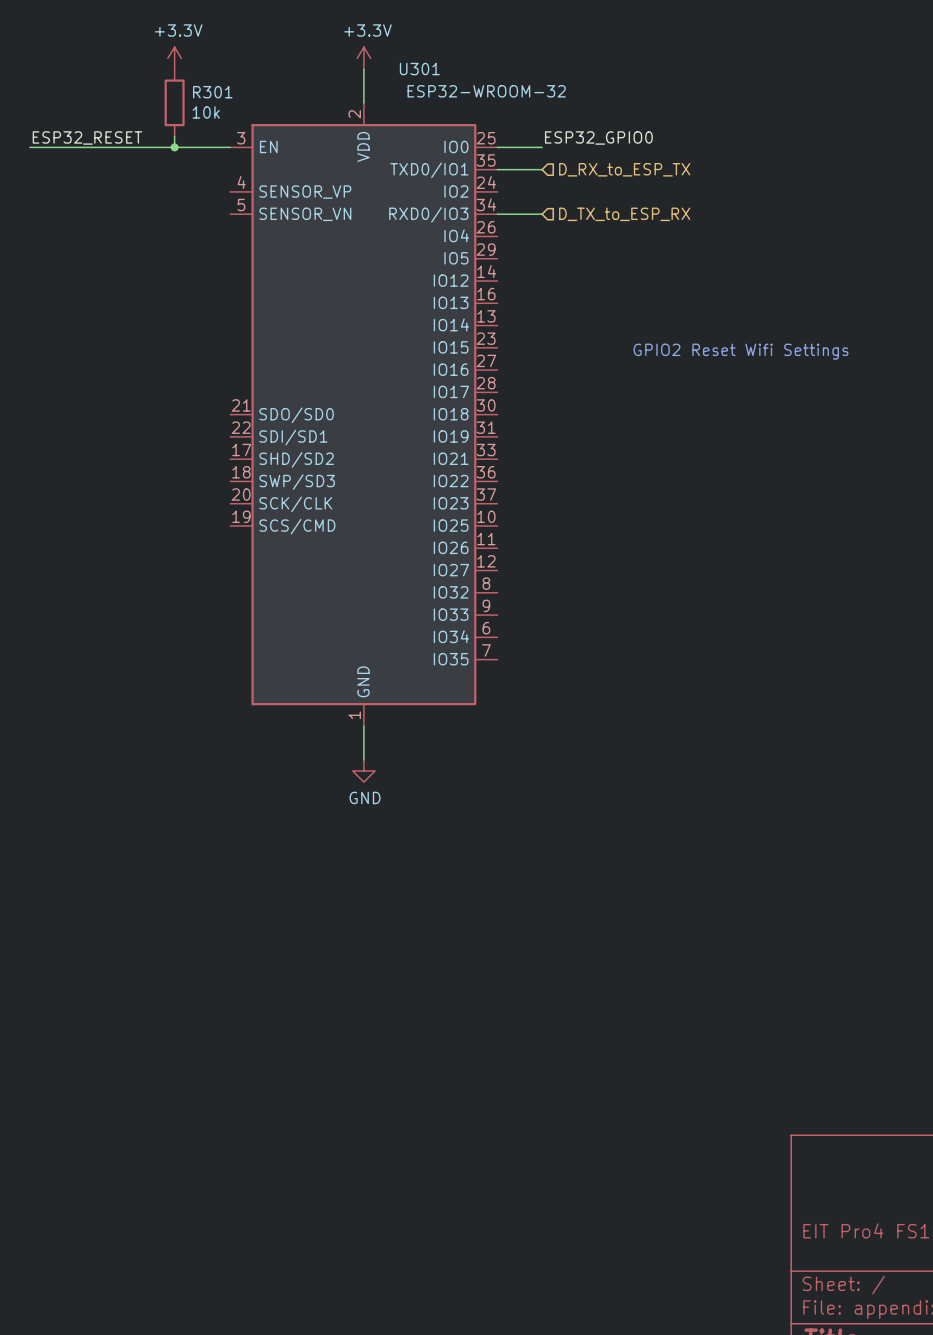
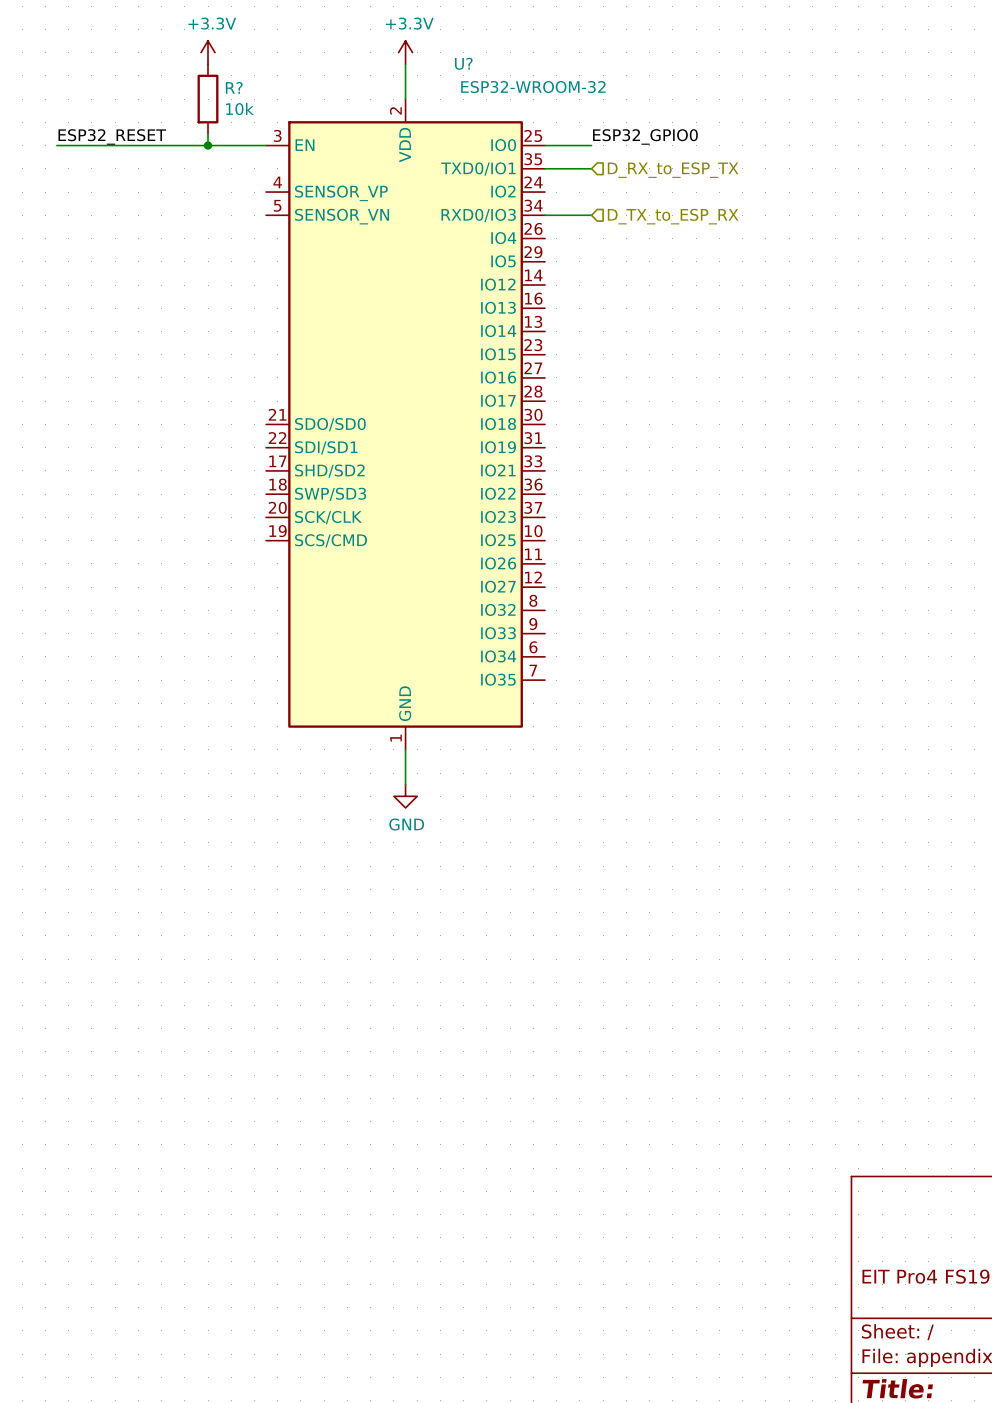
U301 name: U301 (419, 69) -> U? (463, 63)
R301 name: R301 (212, 92) -> R? (234, 87)
text: GPIO2 Reset Wifi Settings (741, 351) -> none

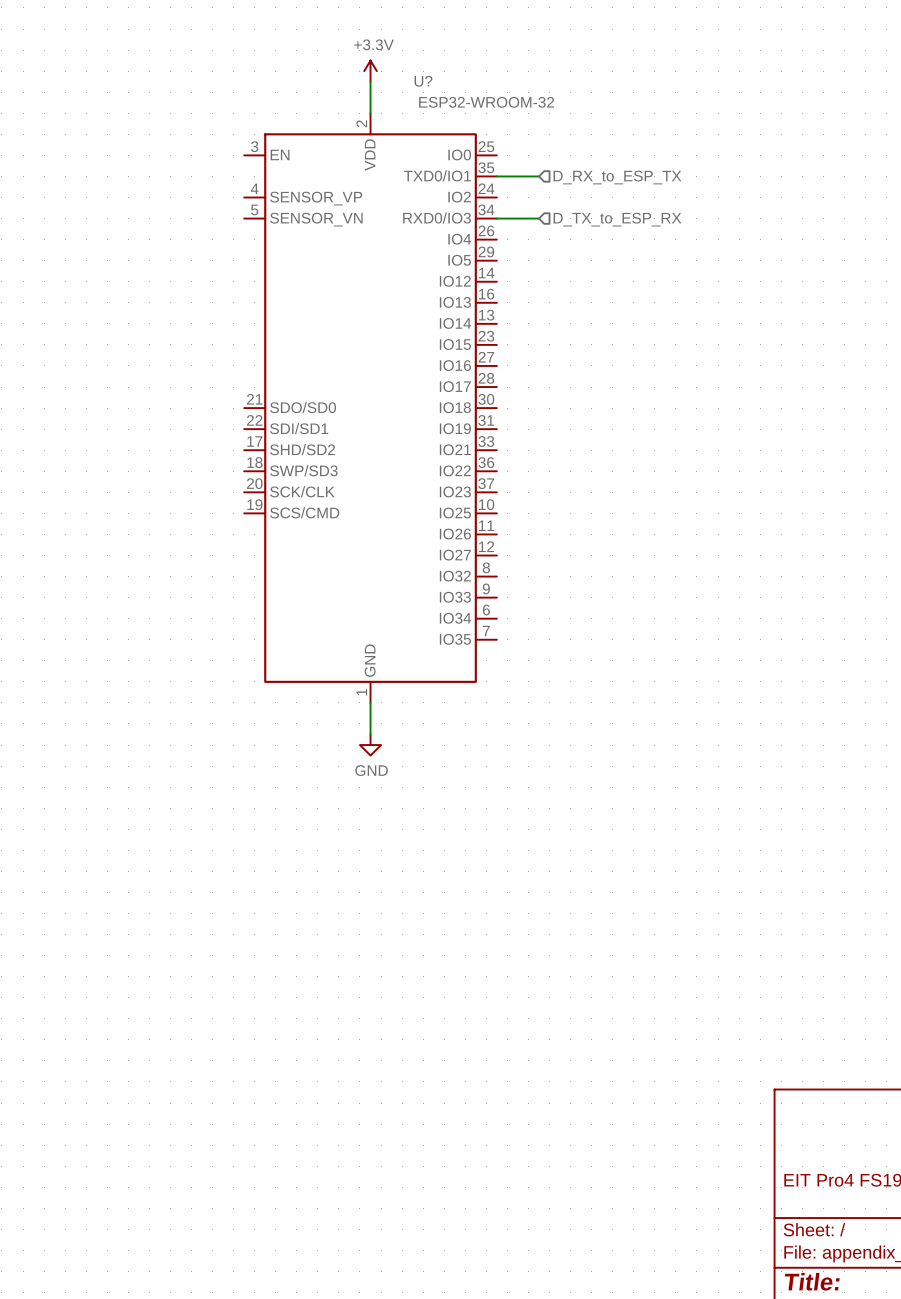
power symbol: +3.3V (208, 52) -> none
R?: 10k (208, 99) -> none
wire: (208, 133) (208, 145) -> none
label: ESP32_RESET (112, 136) -> none
label: ESP32_GPIO0 (645, 136) -> none
wire: (56, 145) (266, 145) -> none
junction: (208, 145) -> none
wire: (545, 145) (591, 145) -> none

